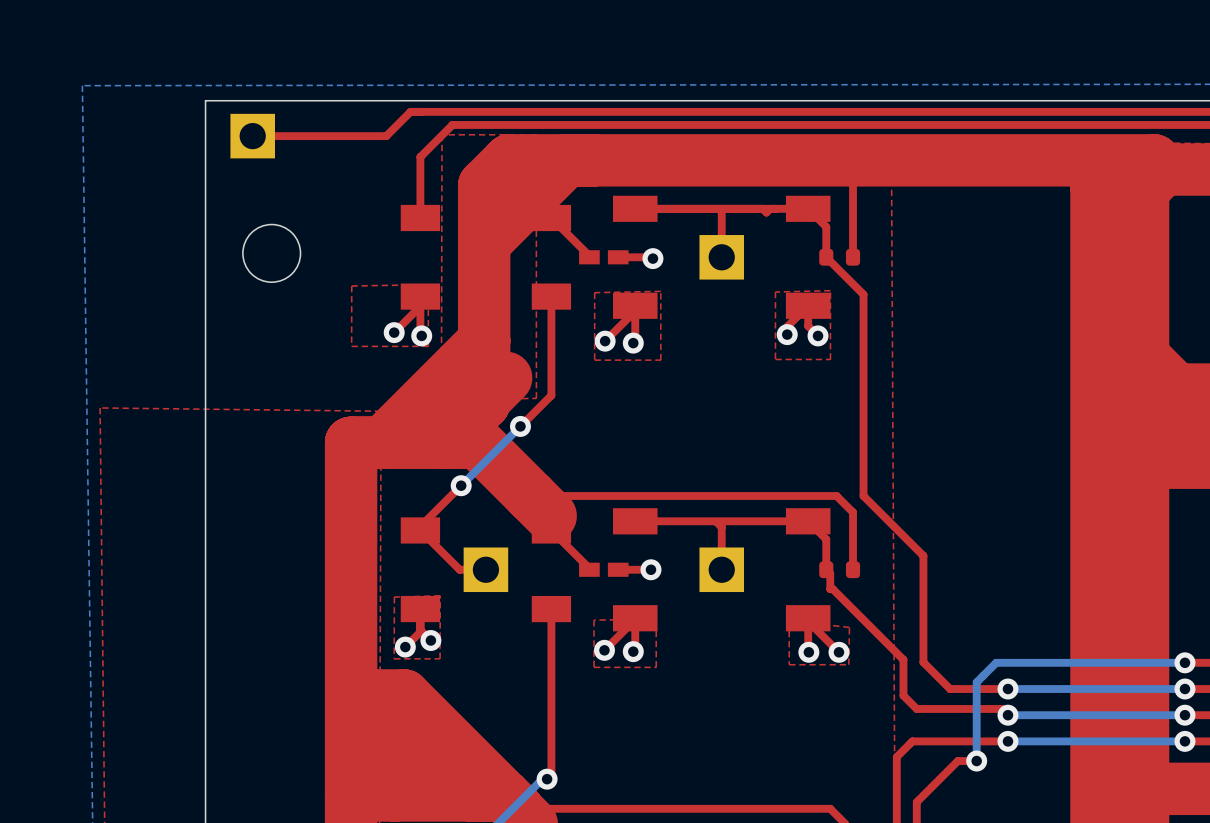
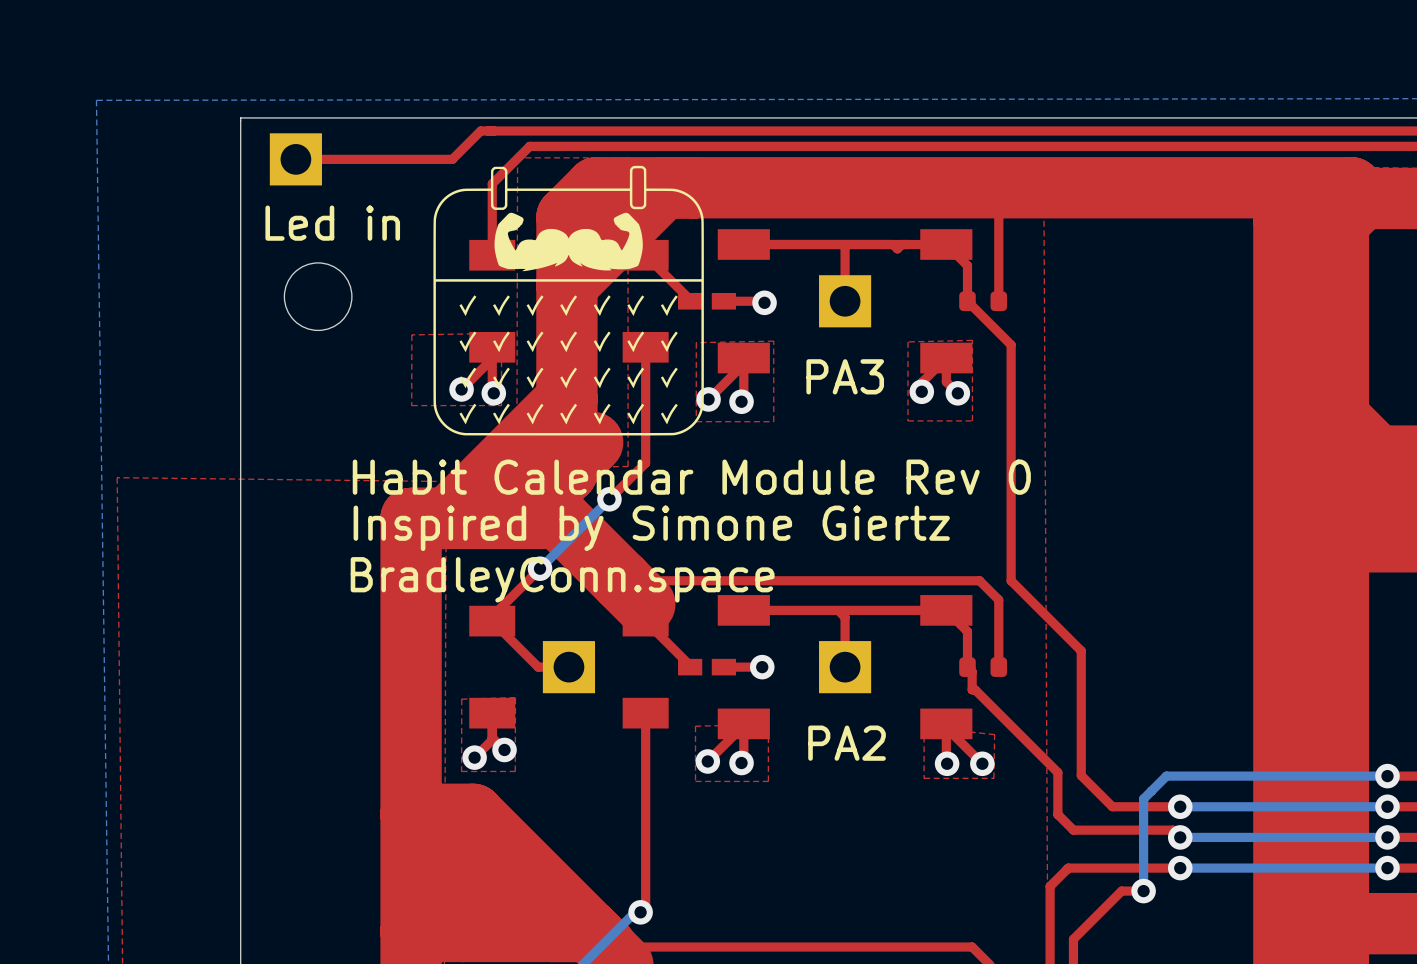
drawing: none -> [433, 165, 704, 436]
text: none -> Led in (332, 223)
text: none -> PA3 (845, 376)
text: none -> Habit Calendar Module Rev 0 (691, 477)
text: none -> Inspired by Simone Giertz (651, 528)
text: none -> BradleyConn.space (562, 579)
text: none -> PA2 (847, 743)

